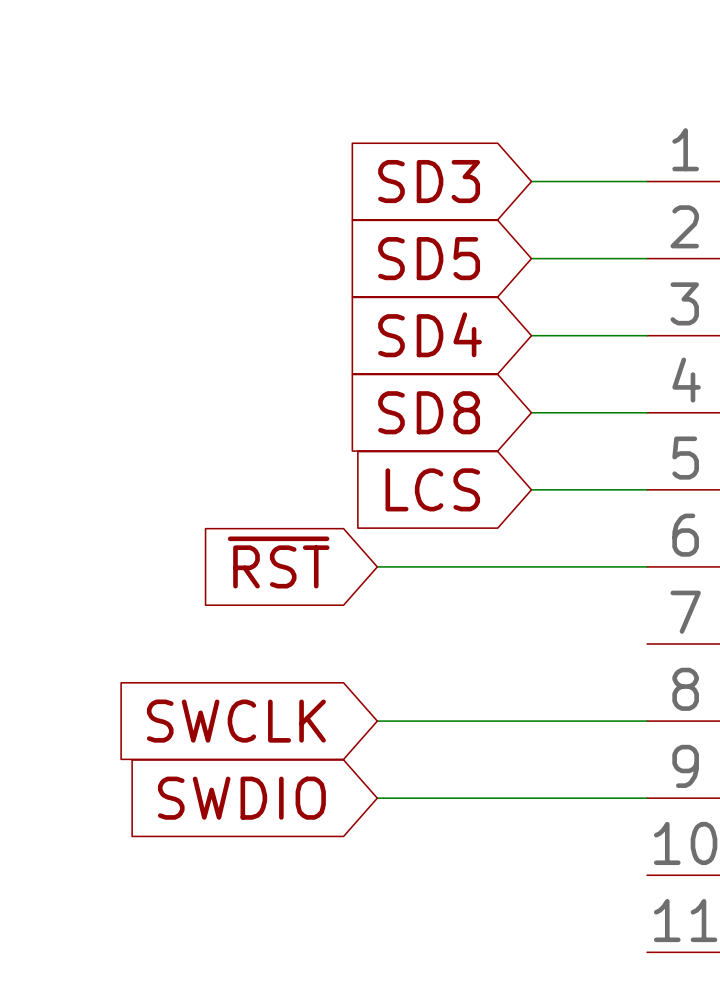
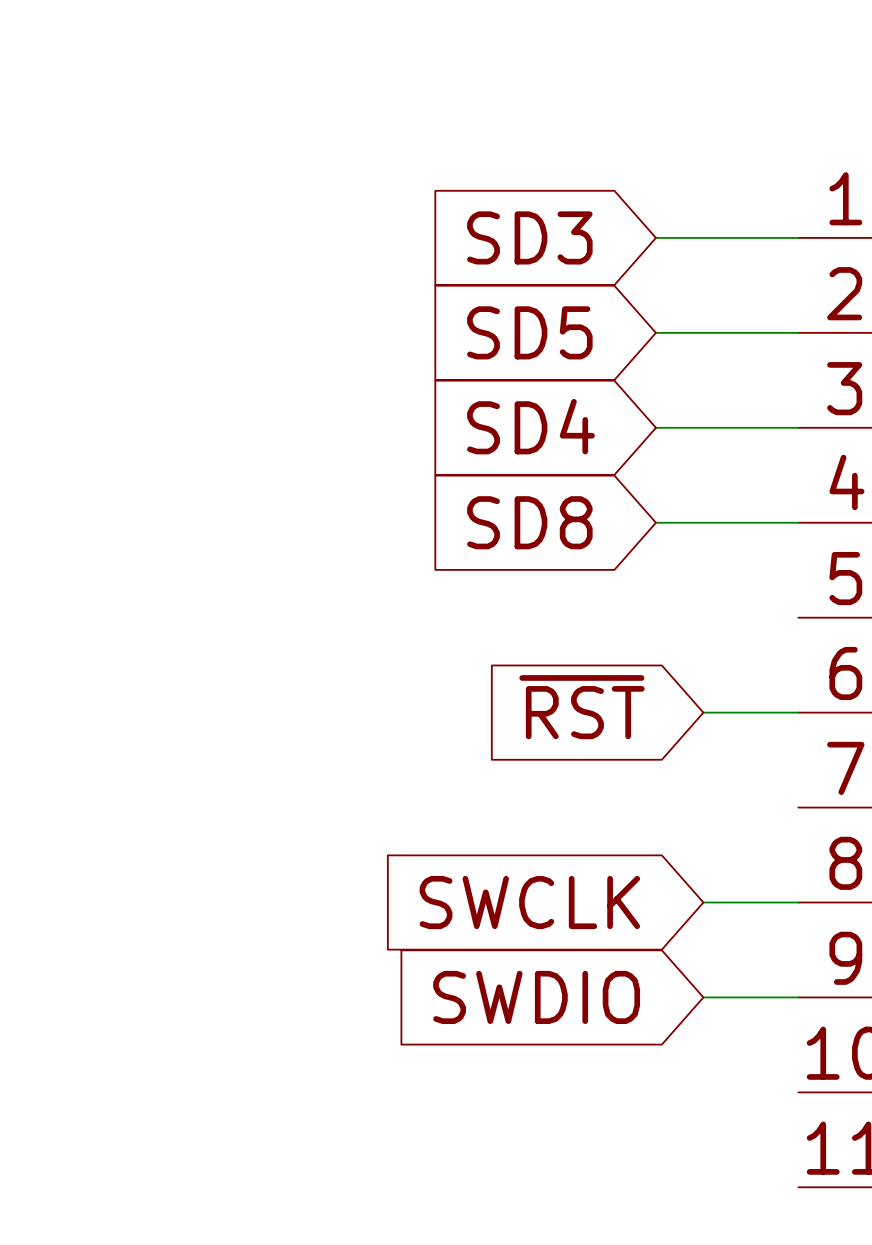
global label: LCS (432, 489) -> none
wire: (531, 489) (647, 489) -> none
global label position: ~{RST} (278, 562) -> ~{RST} (581, 707)
wire: (377, 566) (570, 566) -> none
global label position: SWCLK (236, 721) -> SWCLK (529, 902)
wire: (377, 721) (570, 721) -> none
global label position: SWDIO (241, 798) -> SWDIO (536, 997)
wire: (377, 798) (570, 798) -> none

